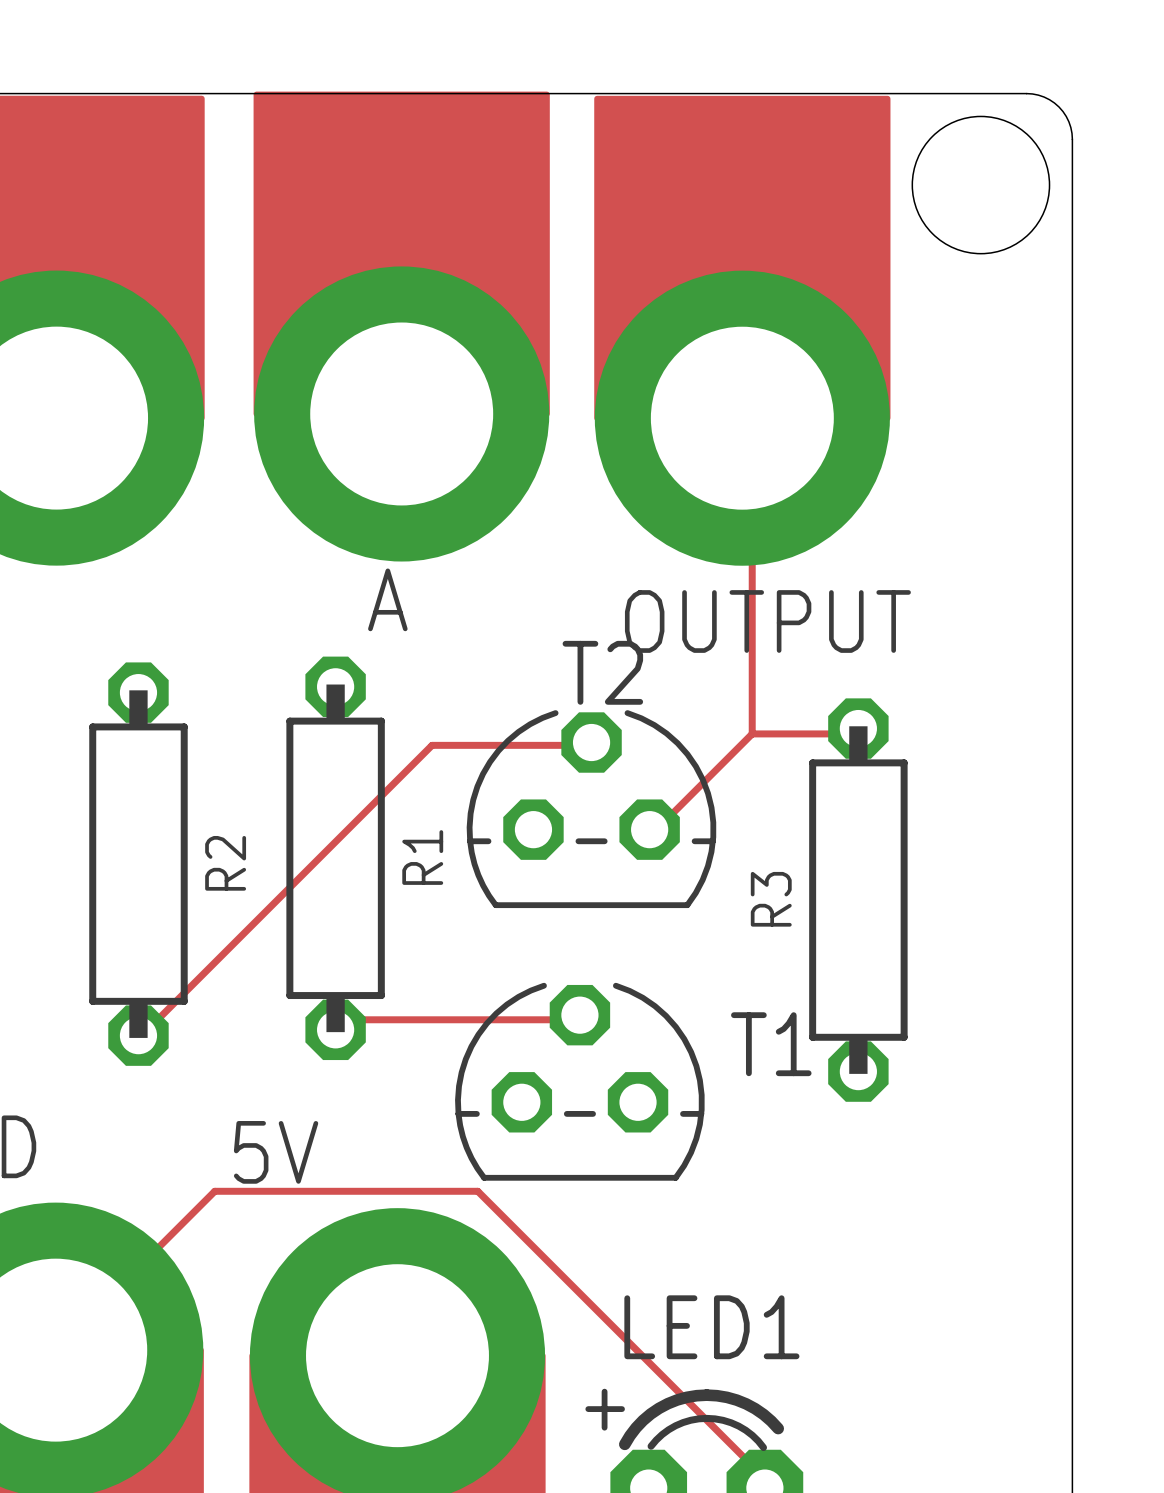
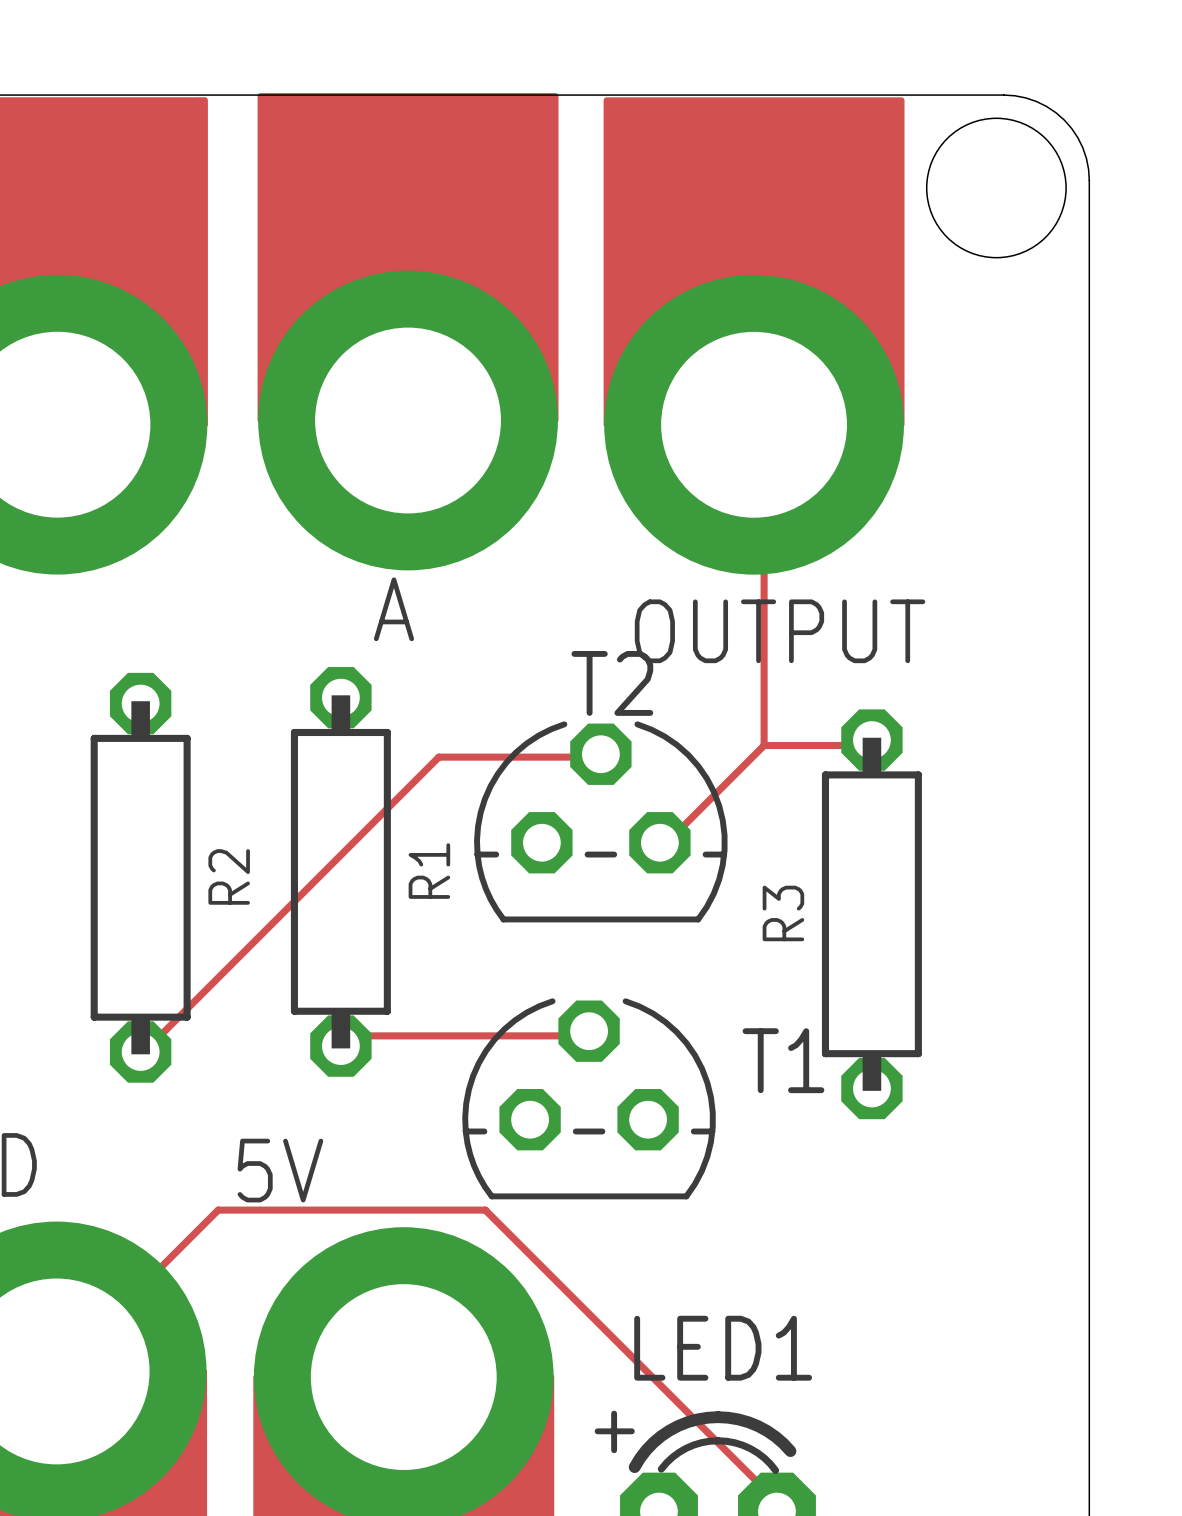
board edge: (988, 93) (1032, 93) (1044, 97) (1058, 106) (1068, 121) (1072, 133) (1072, 177) -> (1003, 95) (1036, 101) (1064, 120) (1082, 147) (1089, 180)

